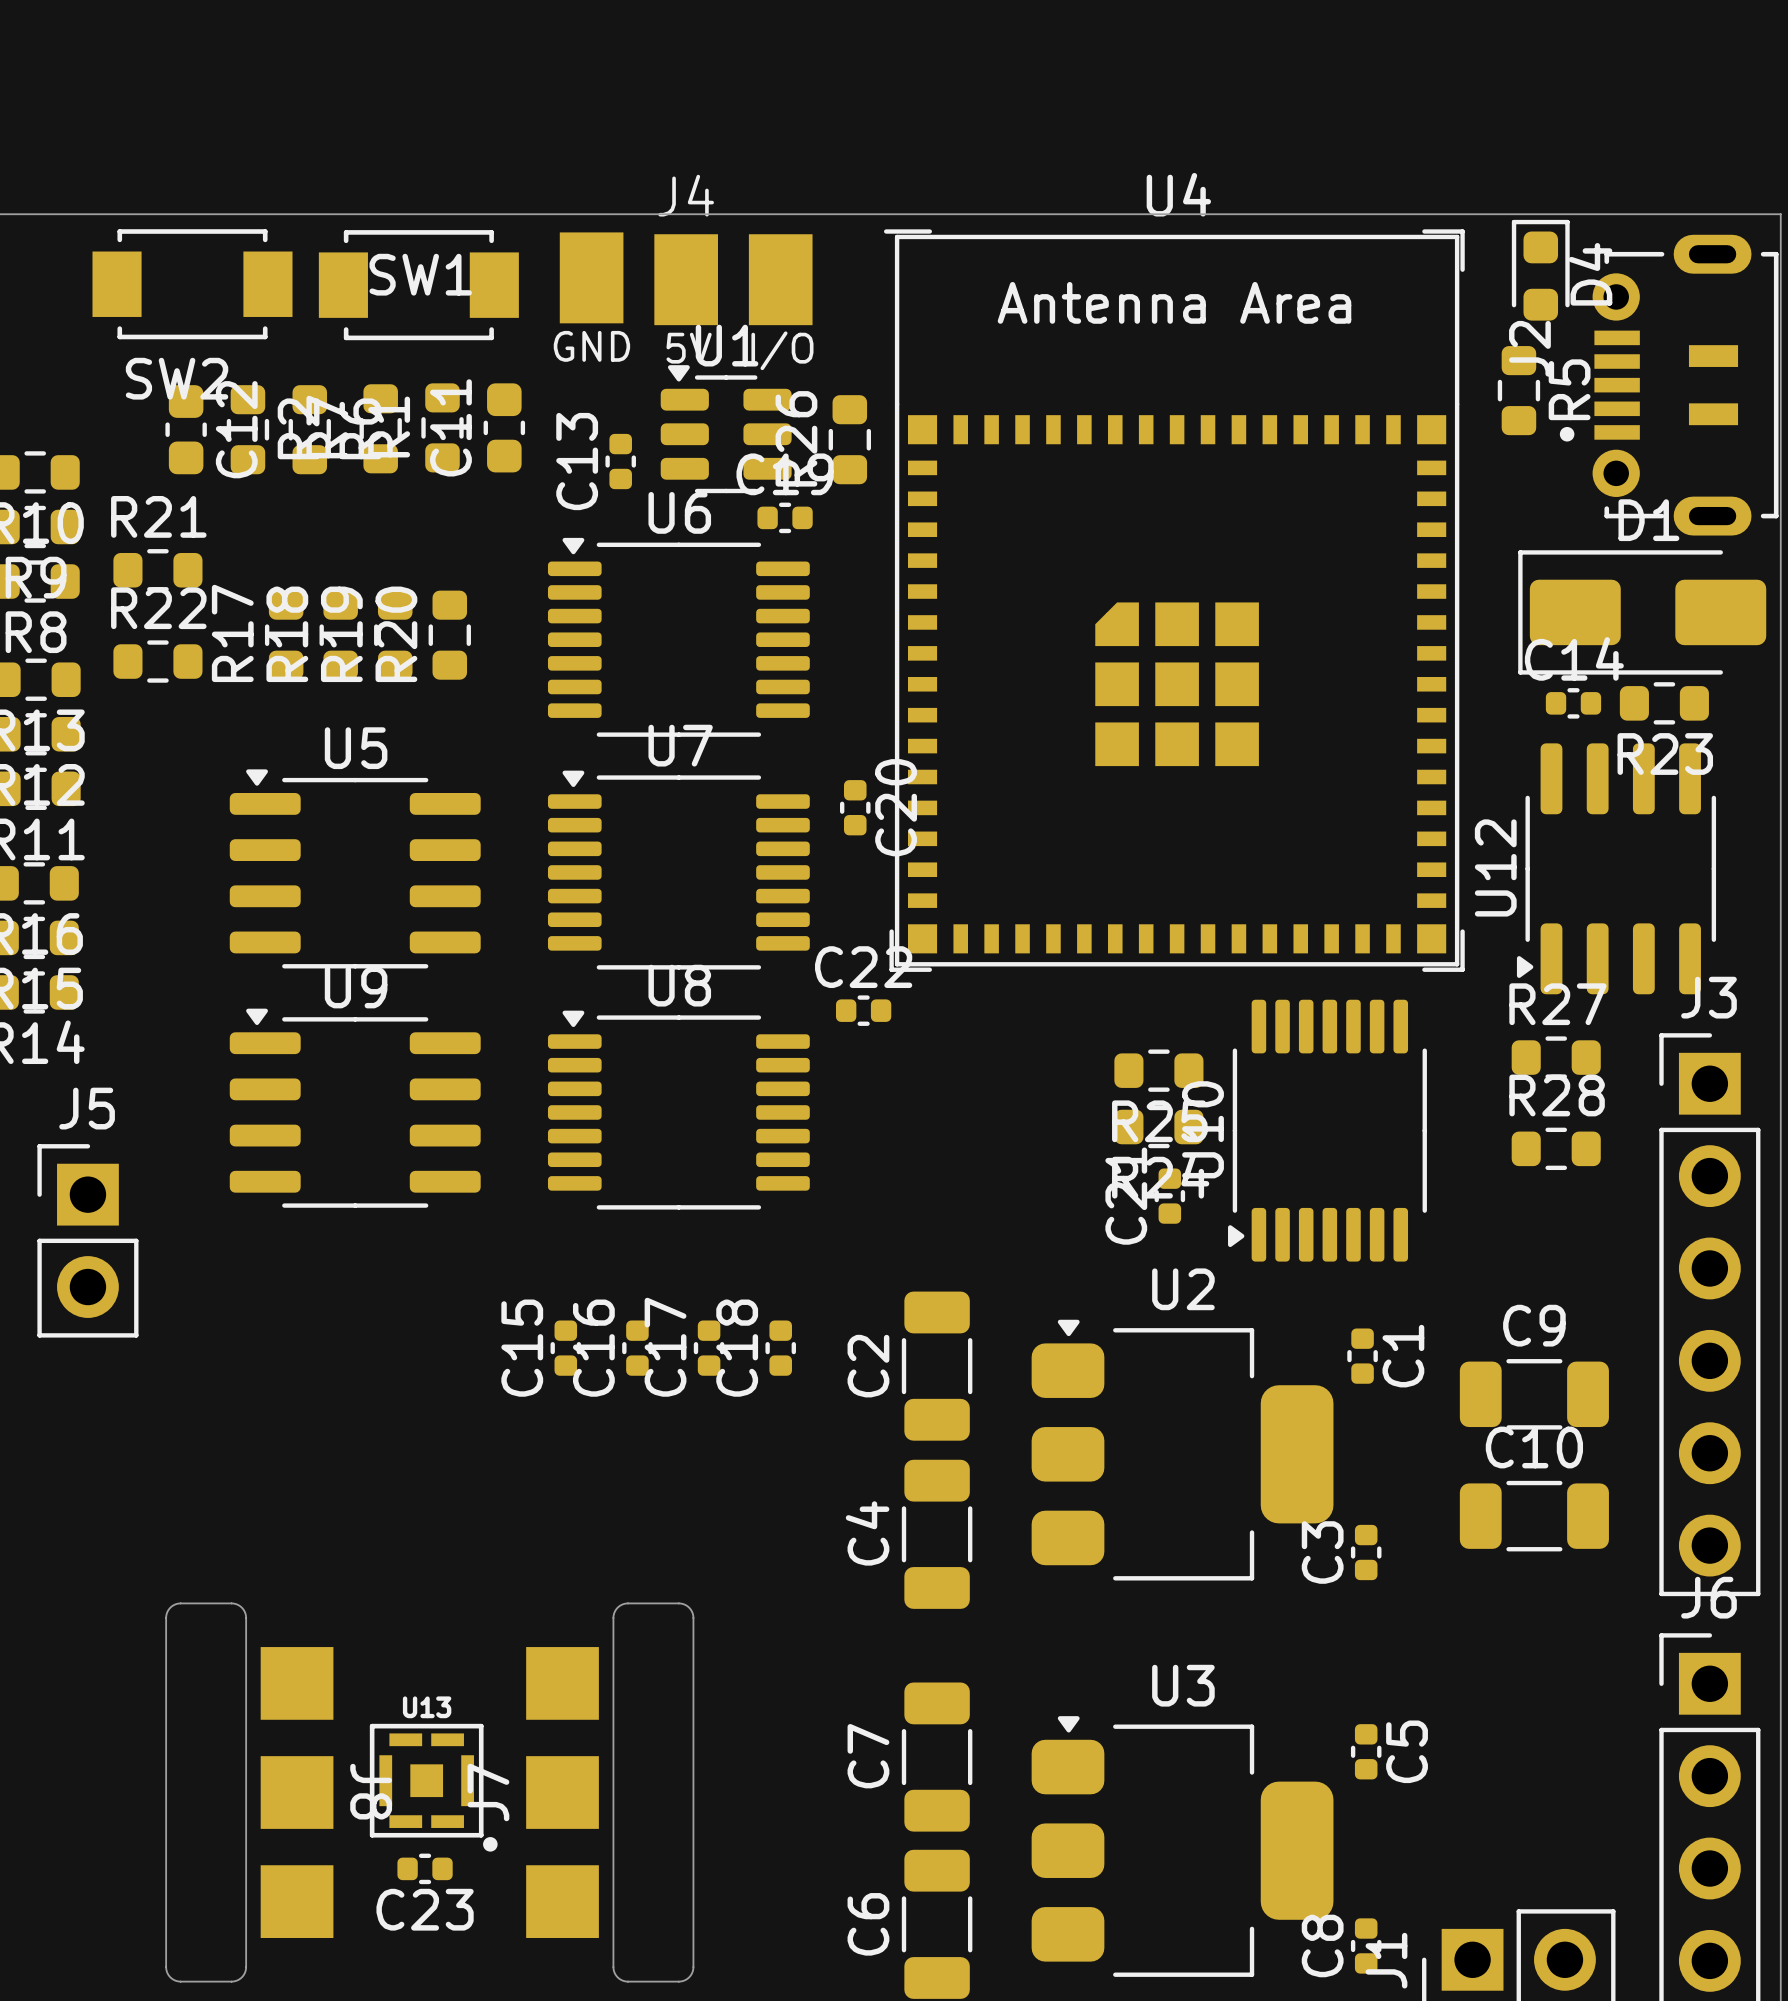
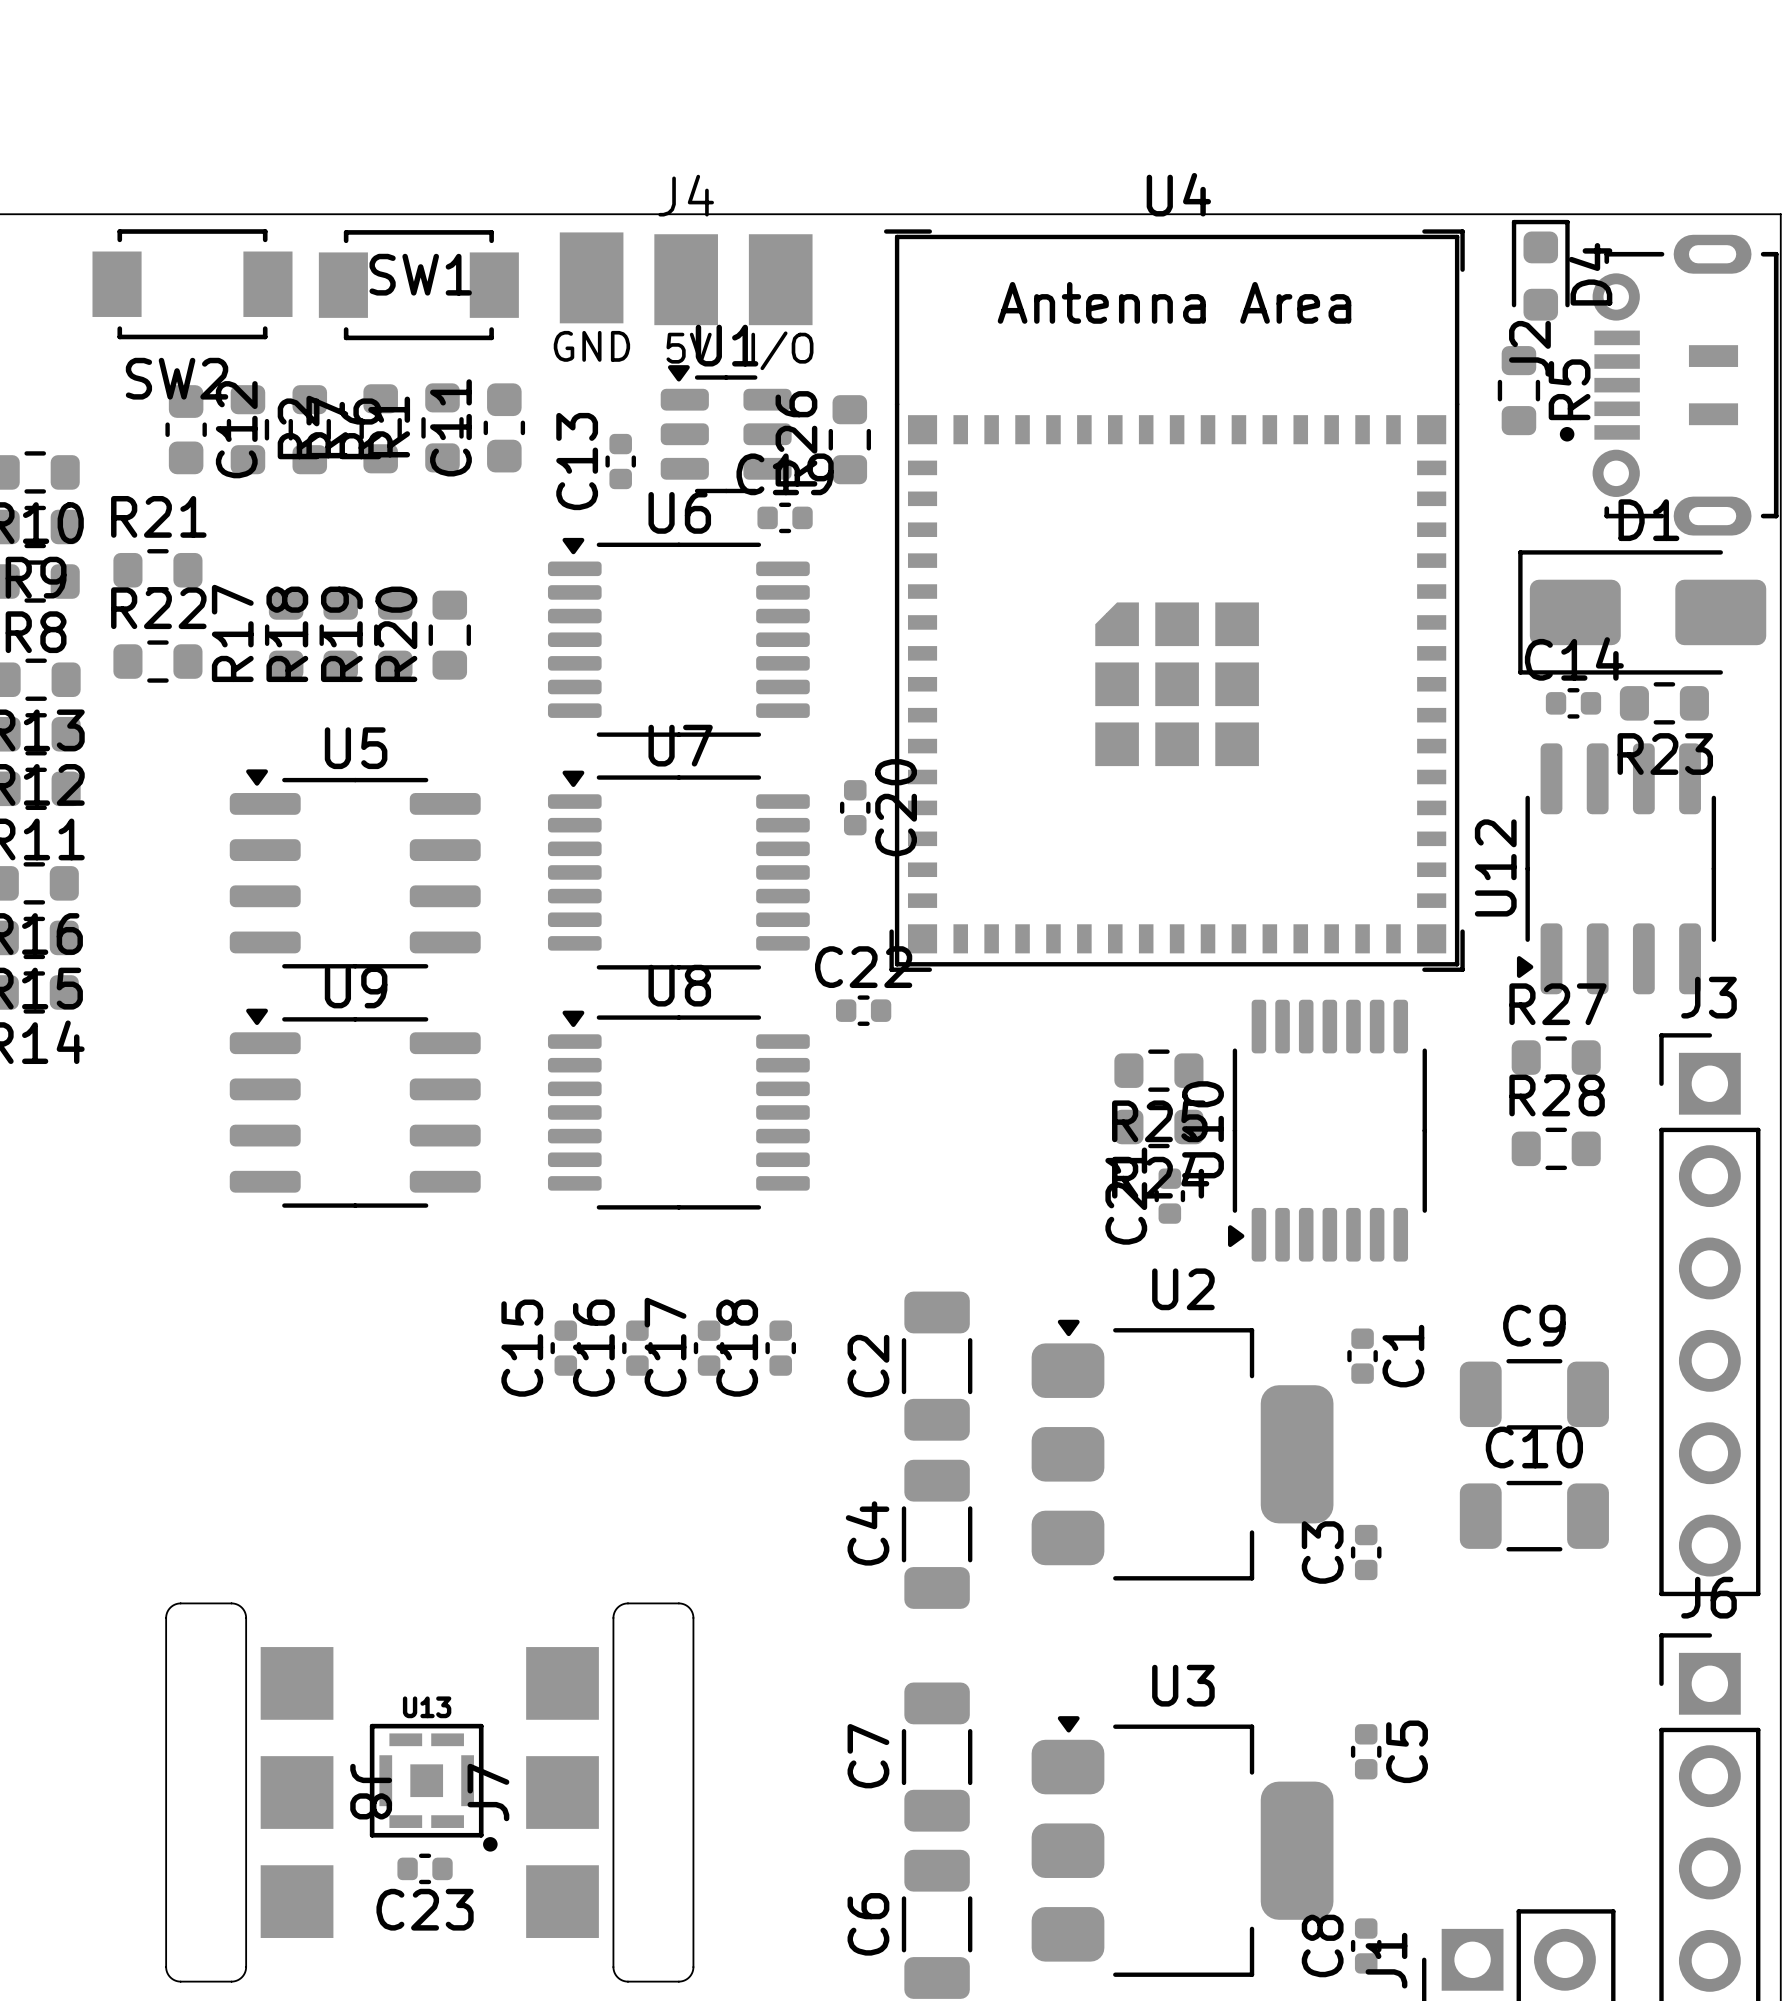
J5: (87, 1240) -> none

